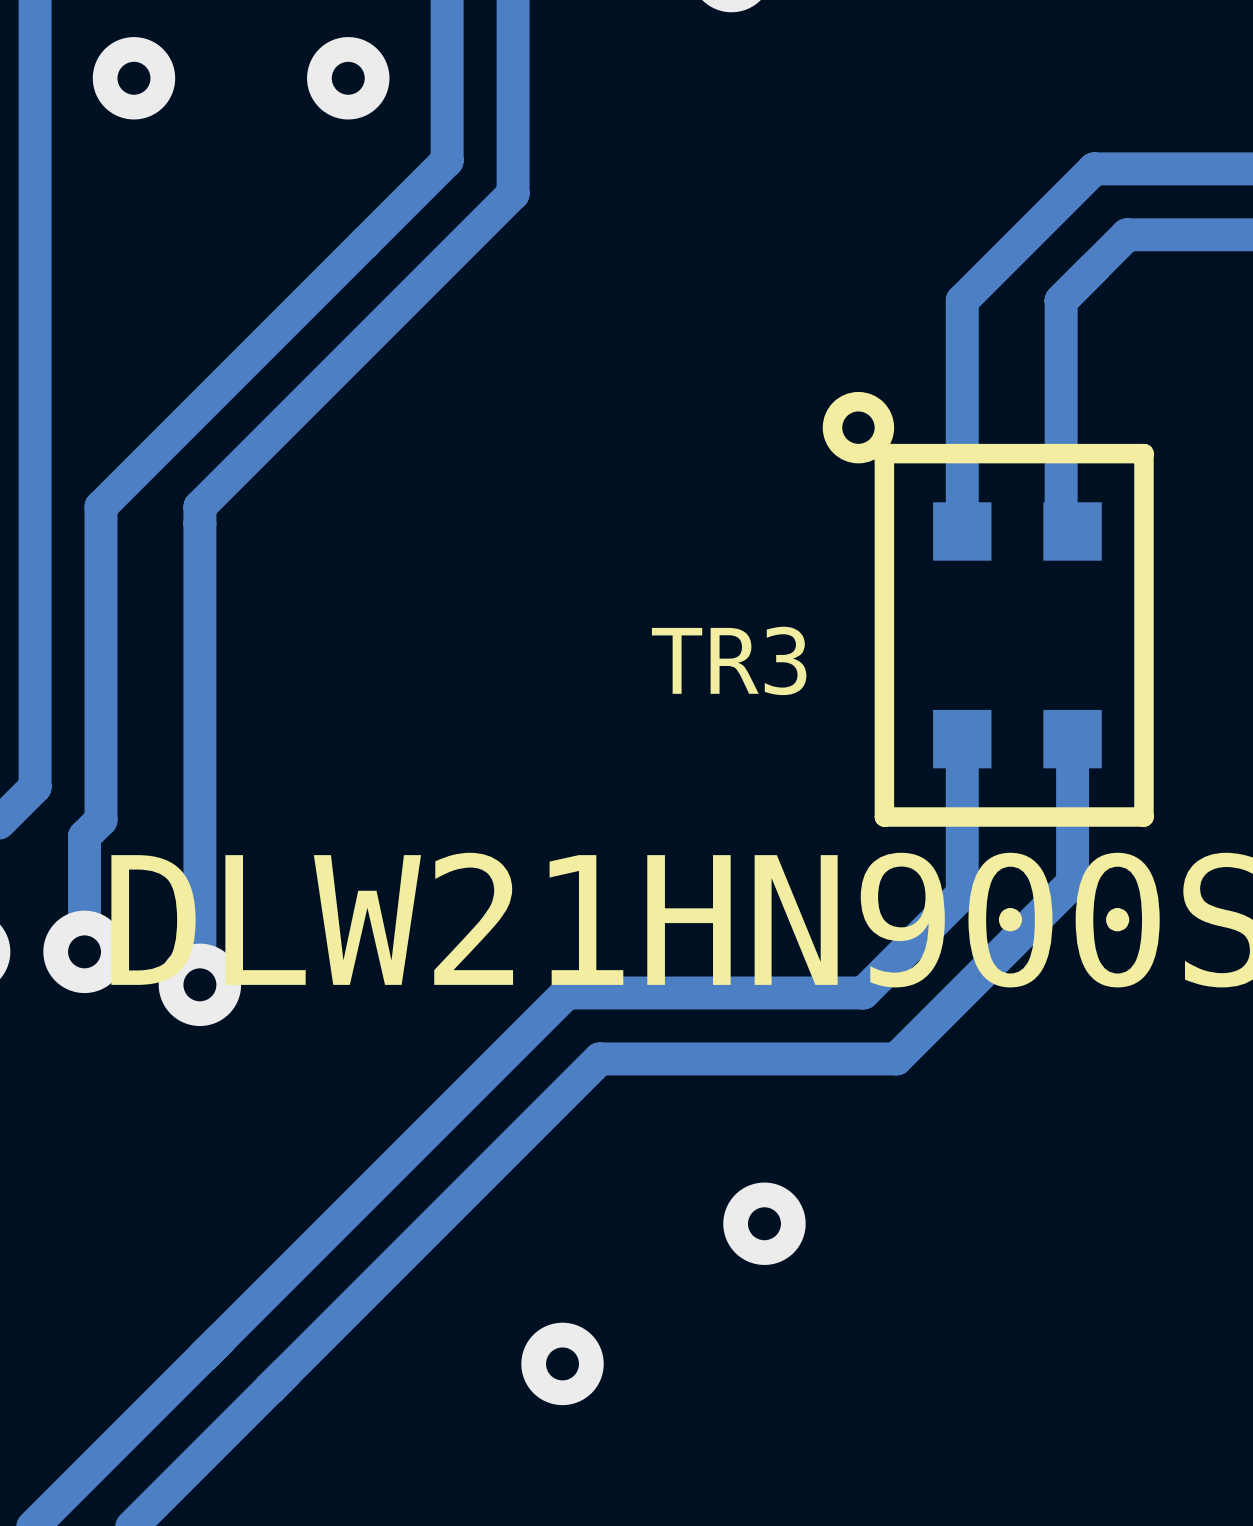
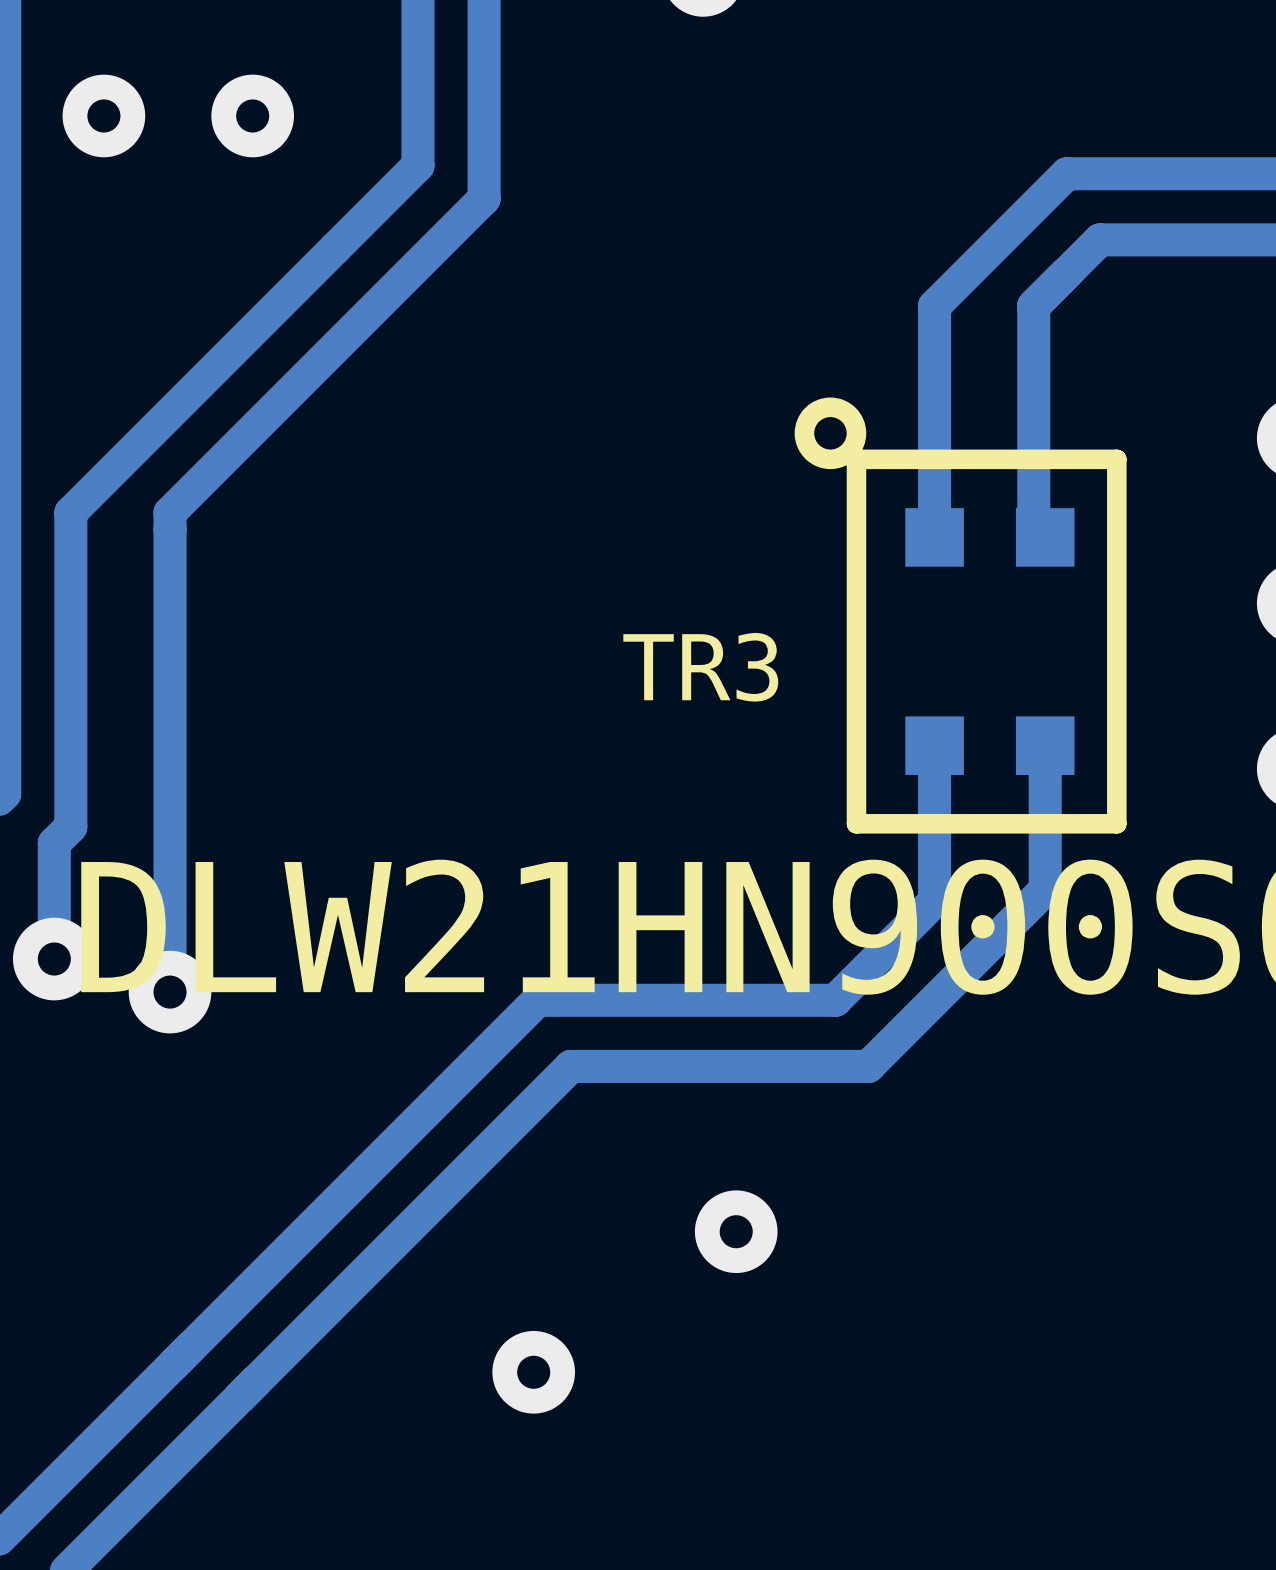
via position: (133, 78) -> (103, 115)
via position: (348, 78) -> (252, 115)

